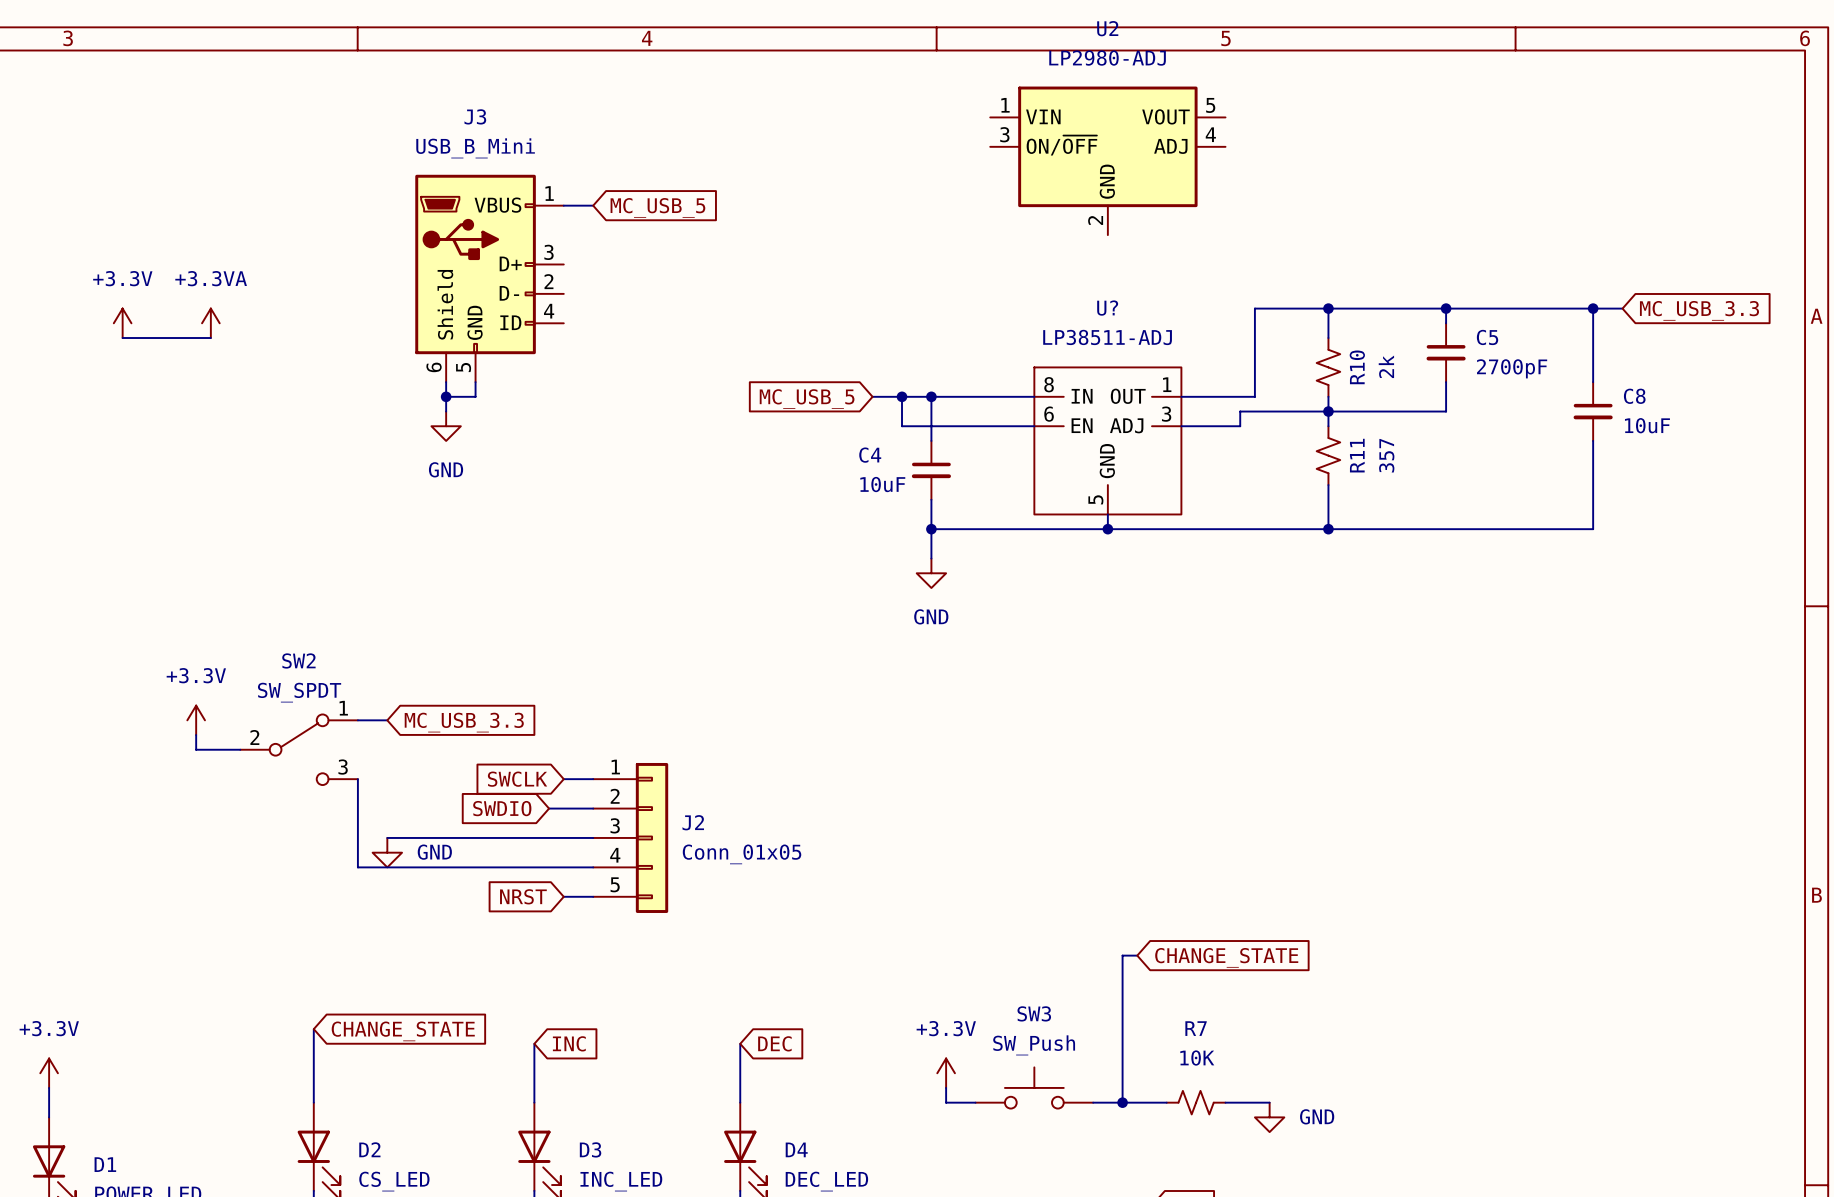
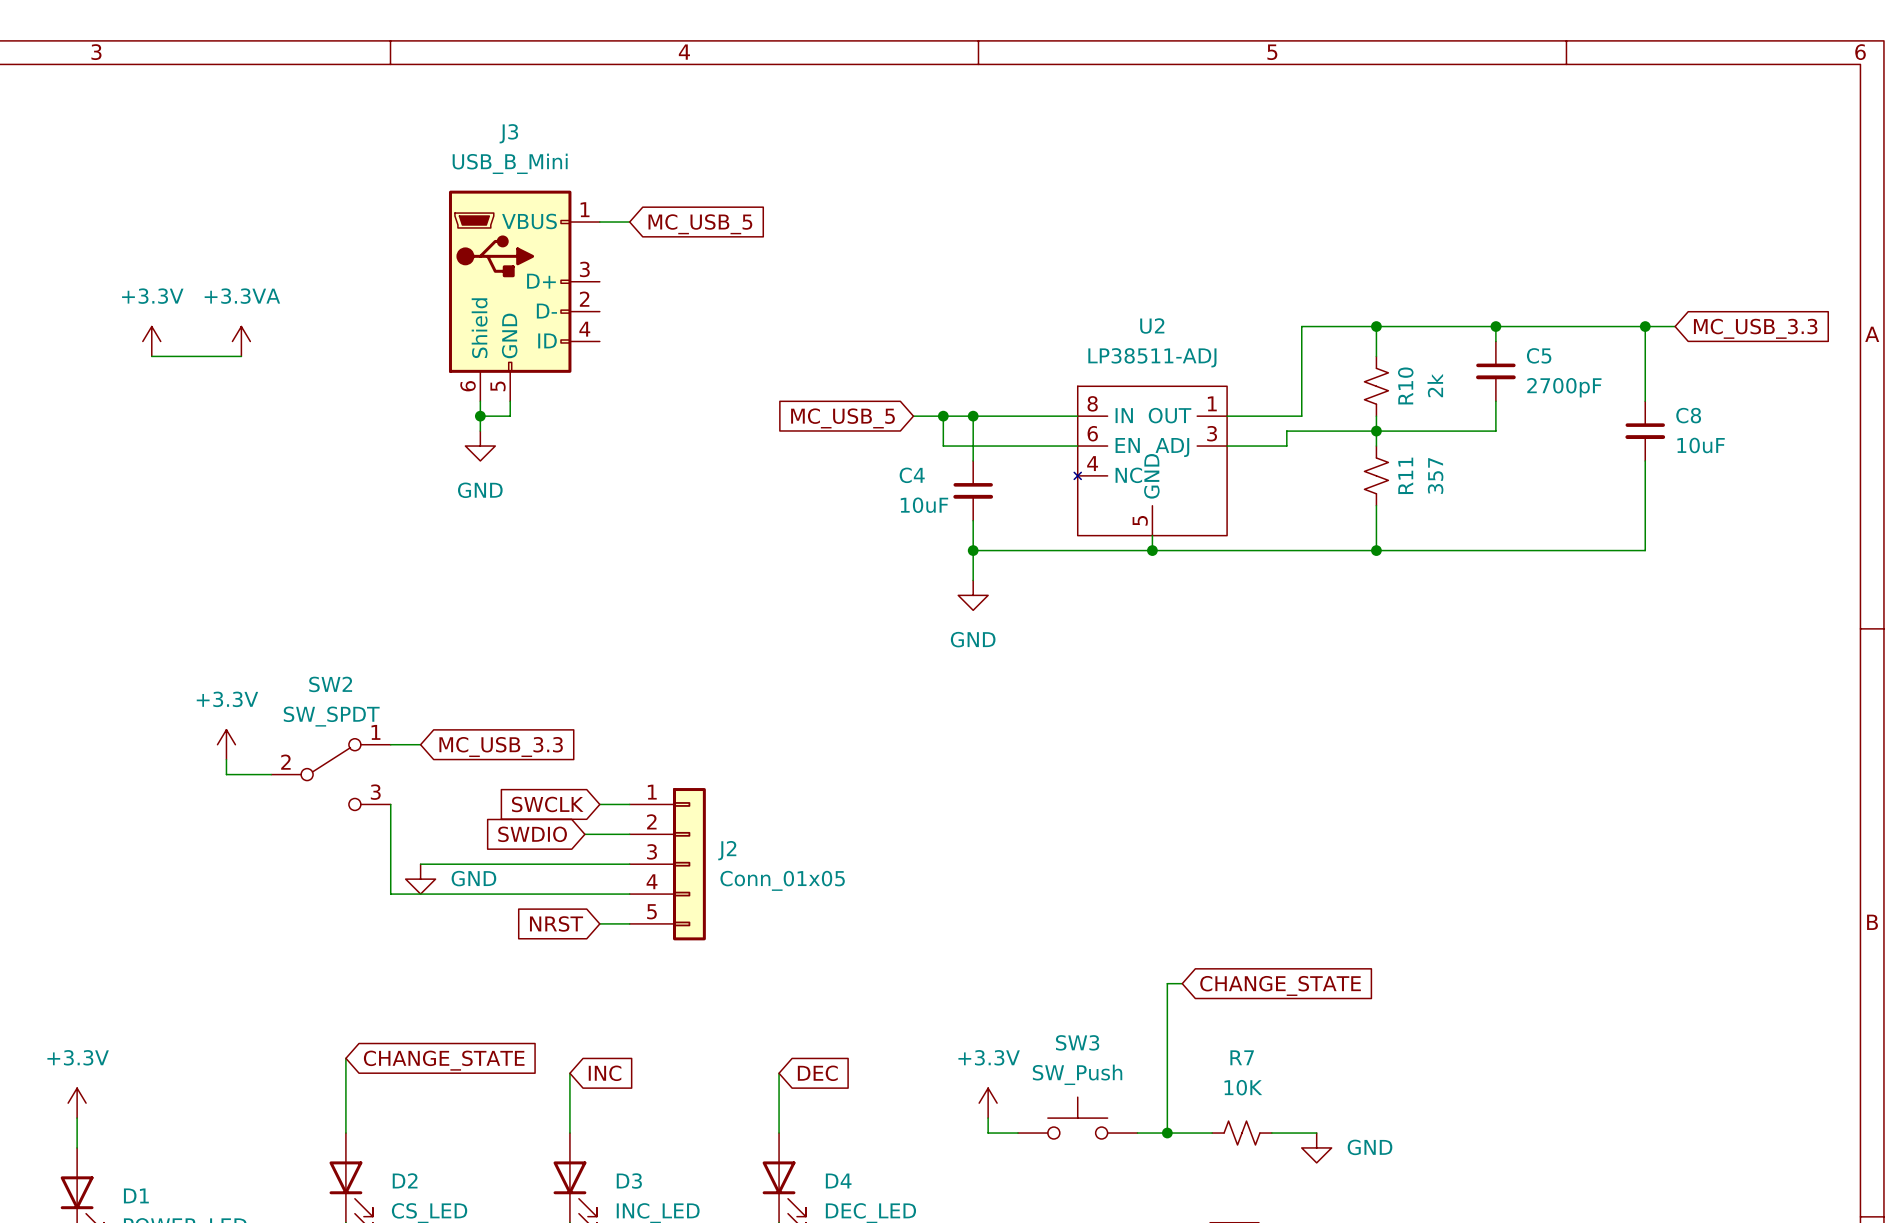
U2 value: LP2980-ADJ (1107, 58) -> LP38511-ADJ (1152, 357)
U2 symbol: [990, 86, 1226, 236] -> [1074, 386, 1228, 536]
U?: LP38511-ADJ (1107, 440) -> none

